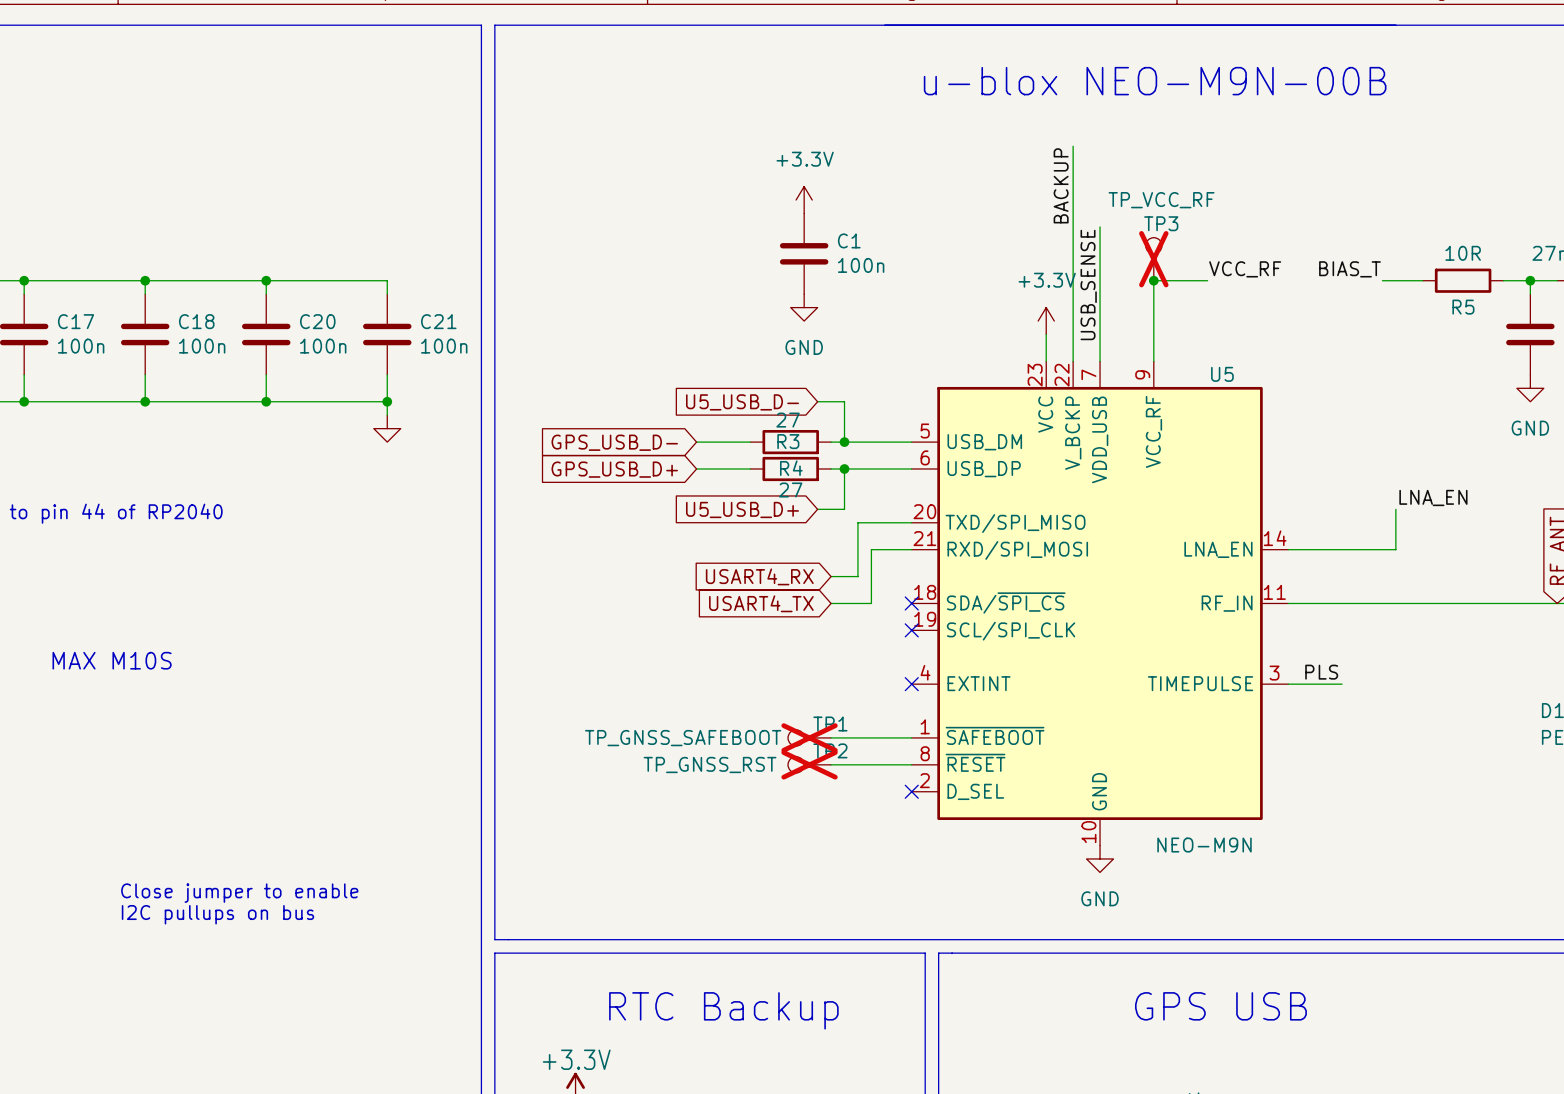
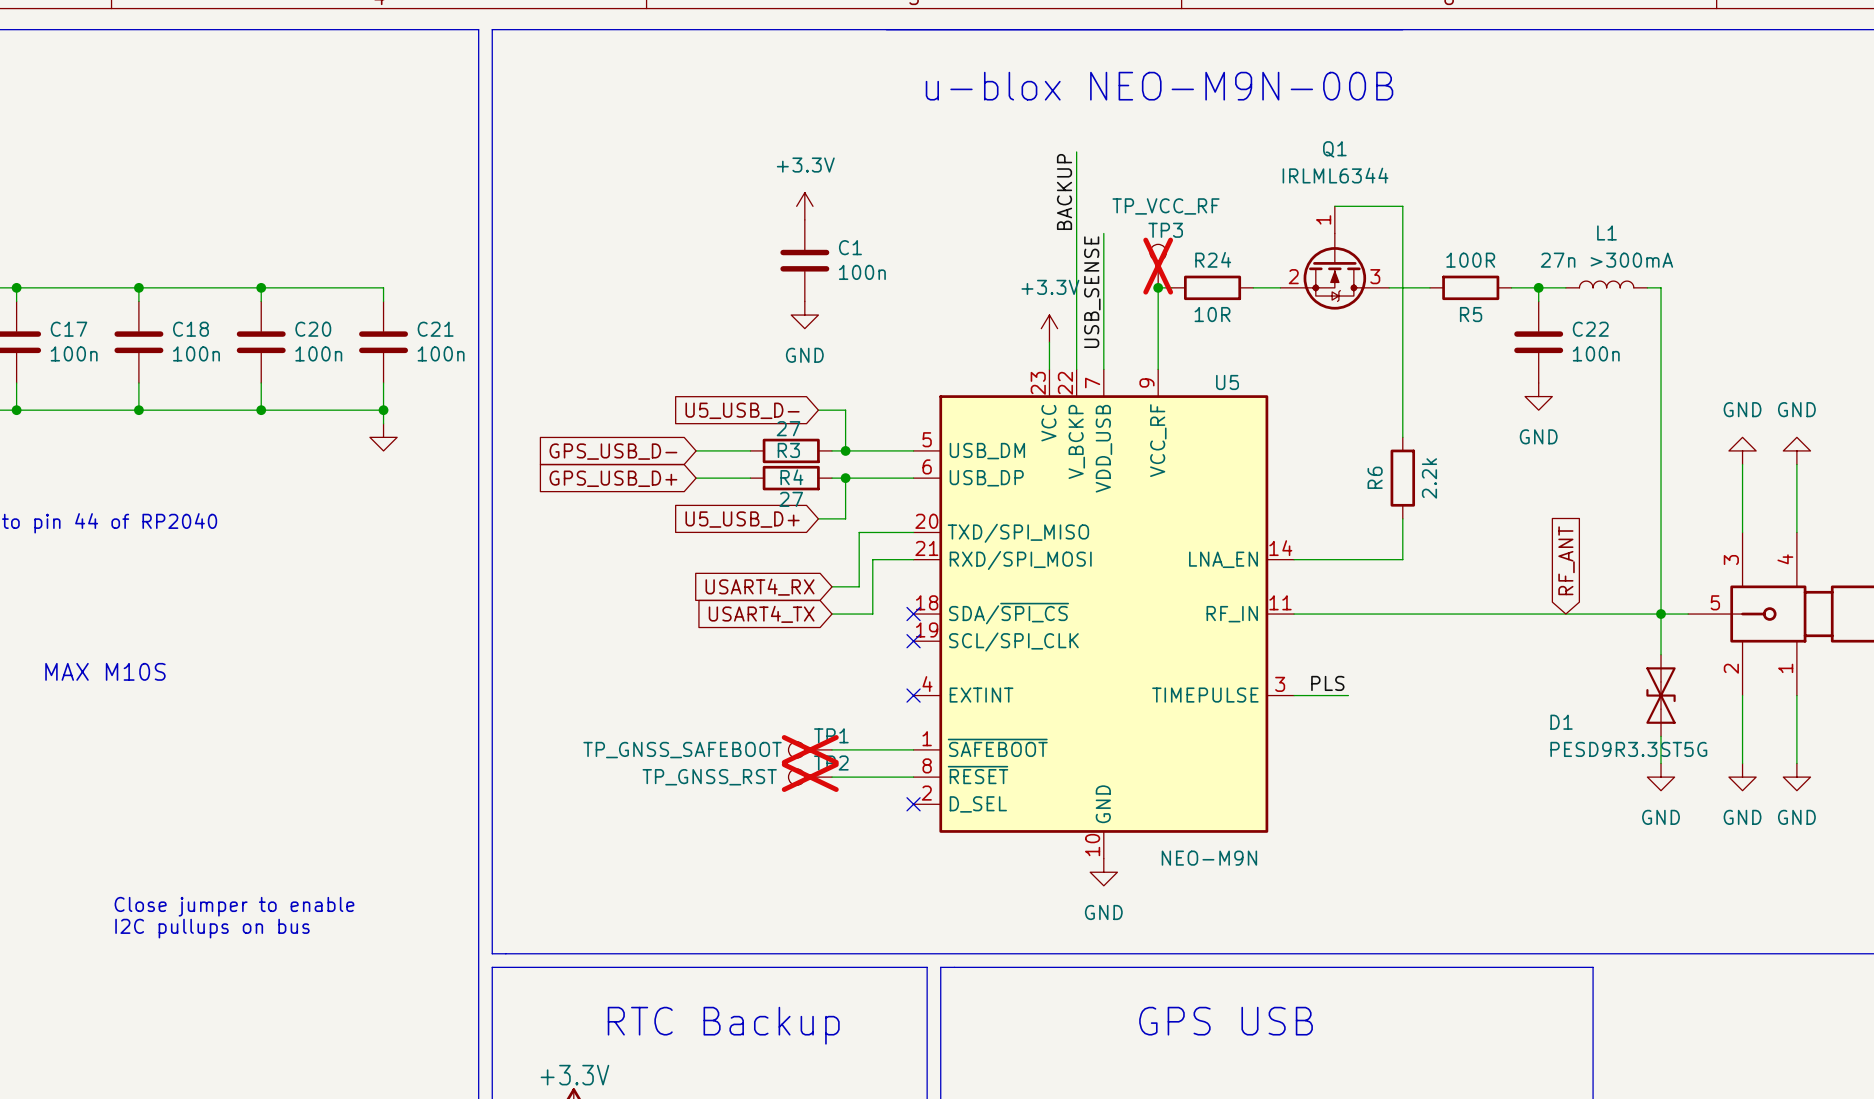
wire: none -> (1334, 206) (1402, 206) (1402, 437)
Q1: none -> IRLML6344 (1334, 257)
R5 value: 10R (1463, 253) -> 100R (1470, 260)
label: VCC_RF (1245, 269) -> none
label: BIAS_T (1349, 269) -> none
wire: (1167, 280) (1207, 280) -> none
R24: none -> 10R (1212, 287)
wire: none -> (1253, 287) (1280, 287)
R6: none -> 2.2k (1402, 478)
label: LNA_EN (1433, 497) -> none

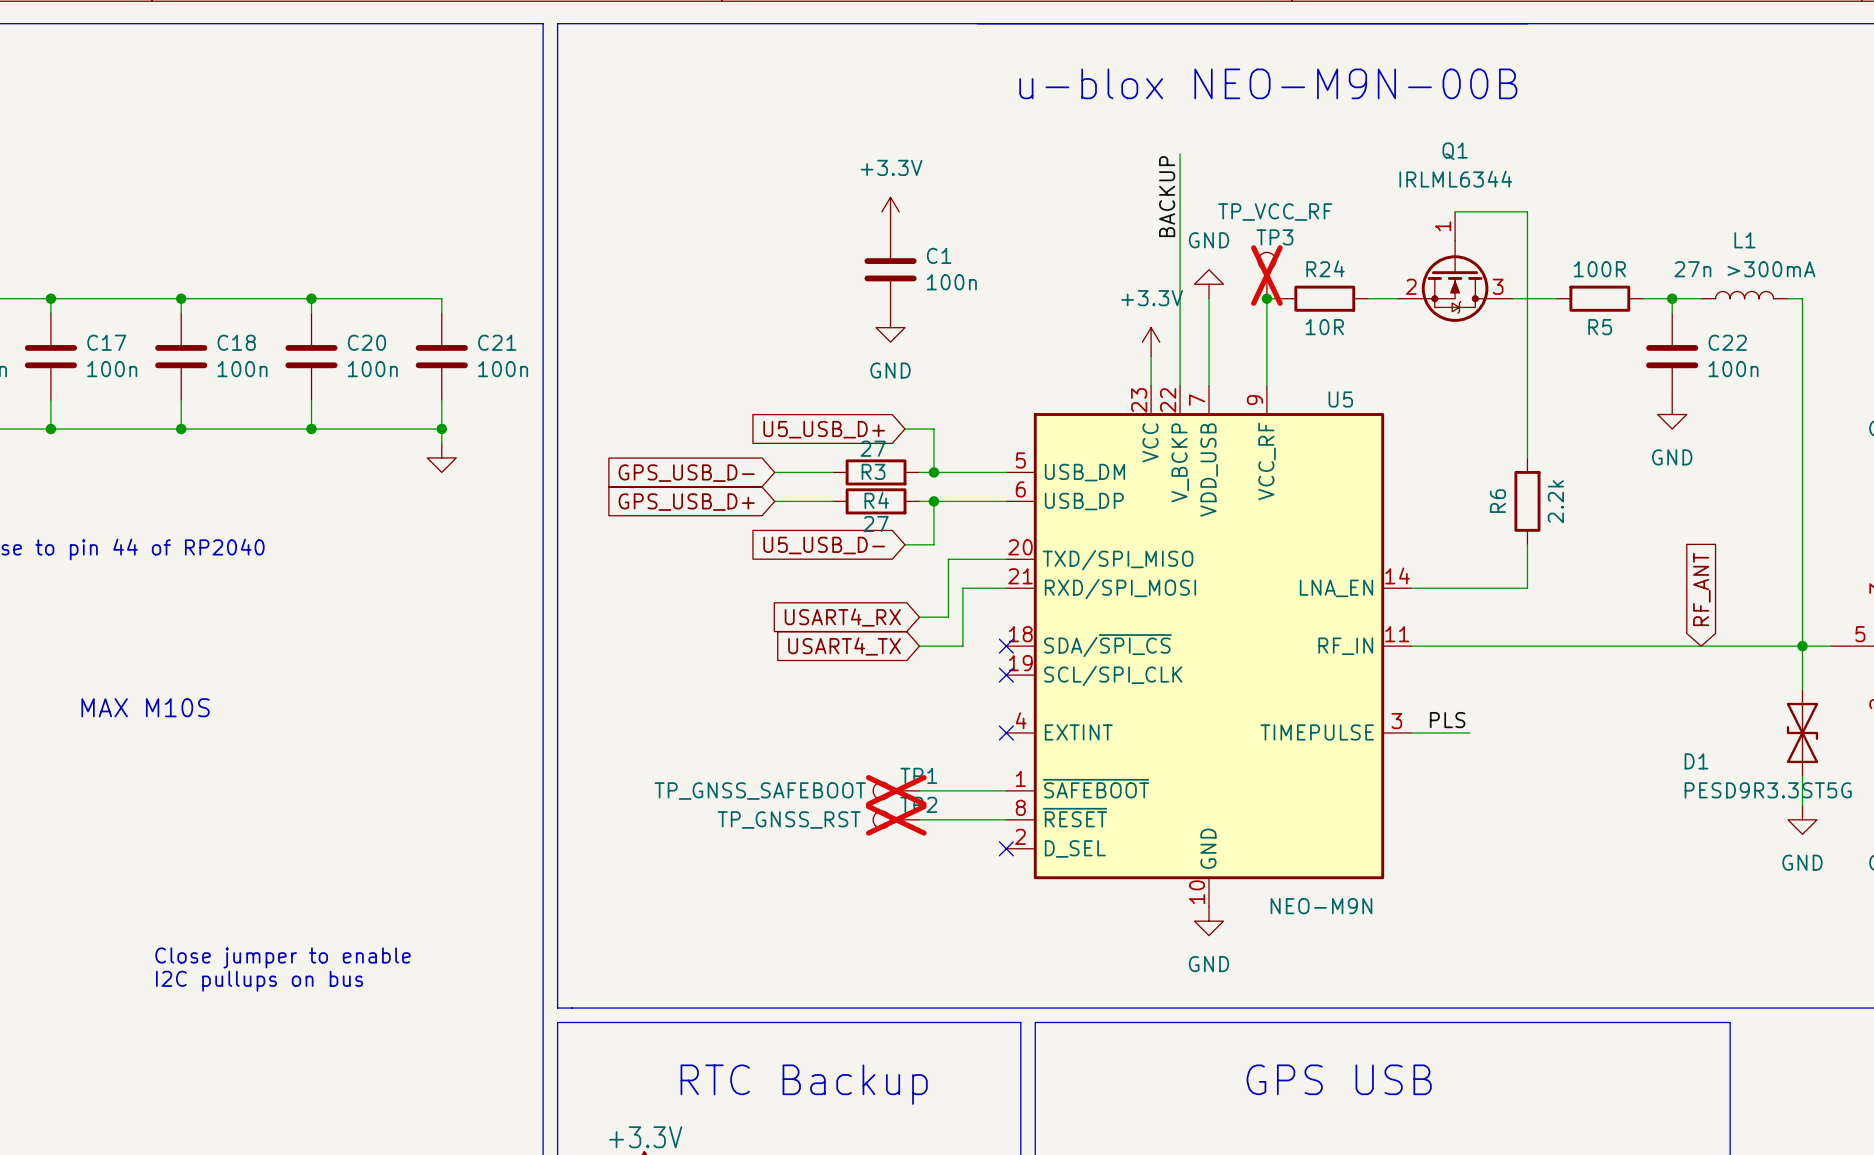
wire: (1103, 233) (1103, 287) -> none
power symbol: none -> GND (1209, 284)
label: USB_SENSE (1092, 292) -> none
global label: U5_USB_D- (742, 410) -> U5_USB_D+ (824, 429)
global label: U5_USB_D+ (742, 519) -> U5_USB_D- (824, 545)

